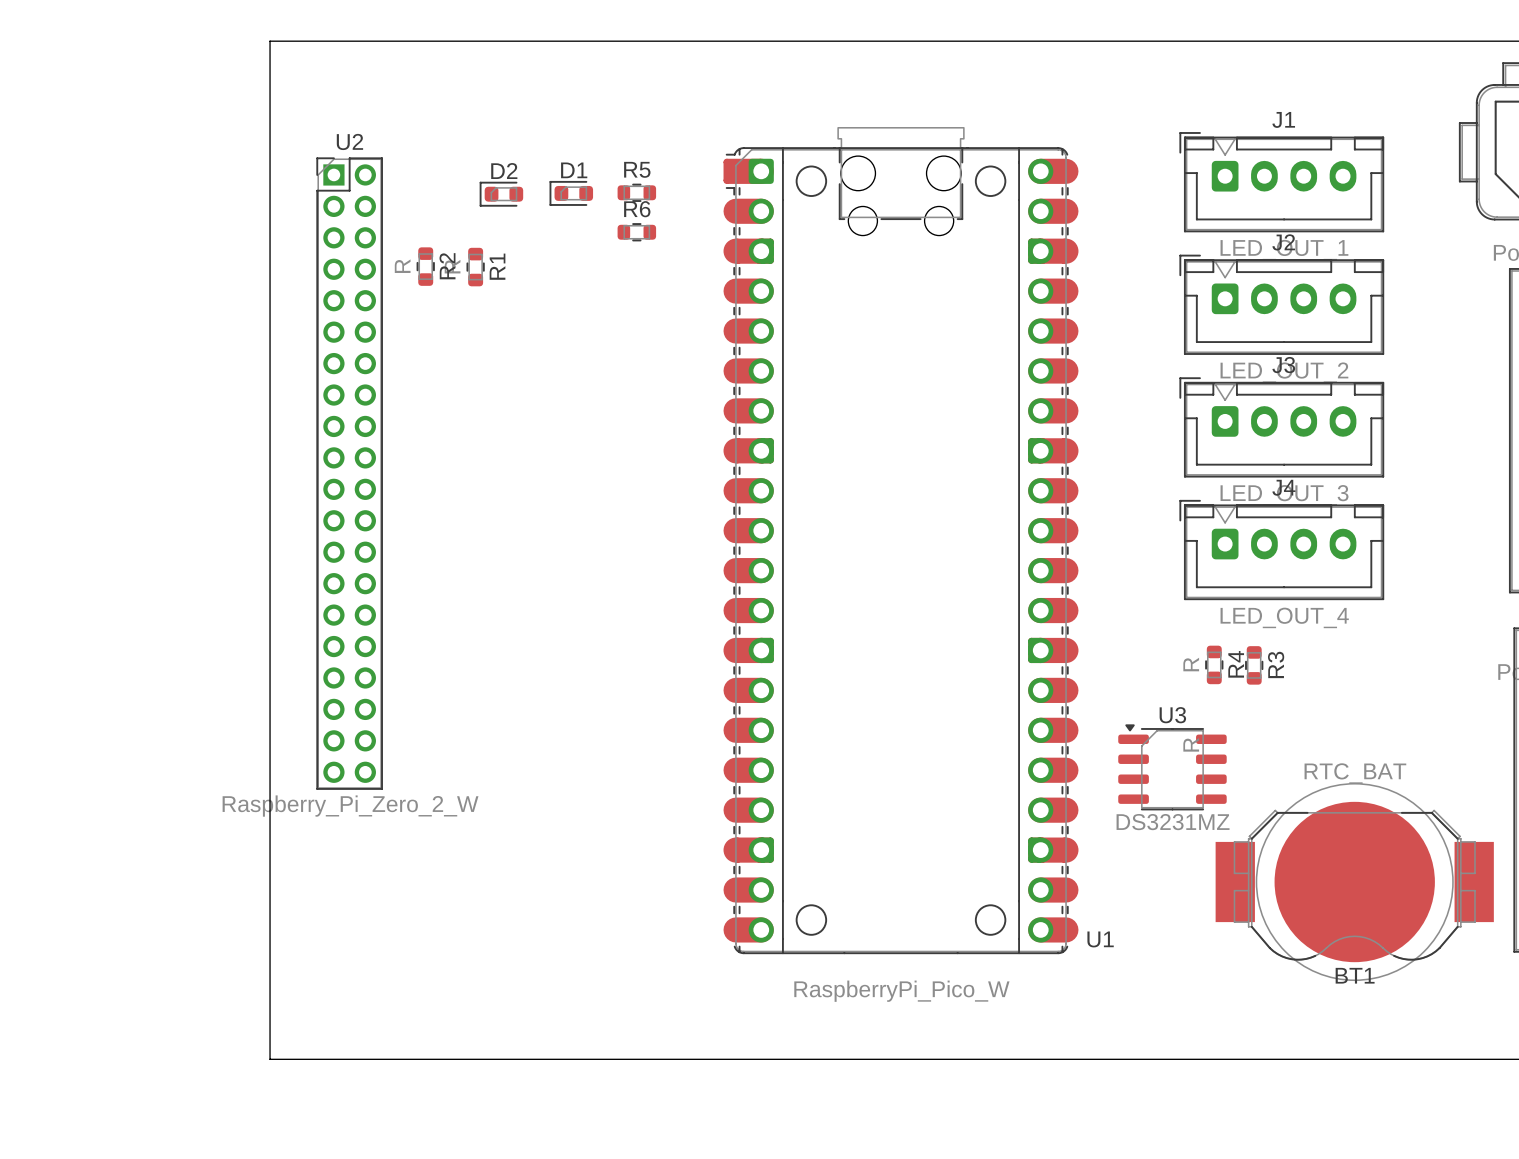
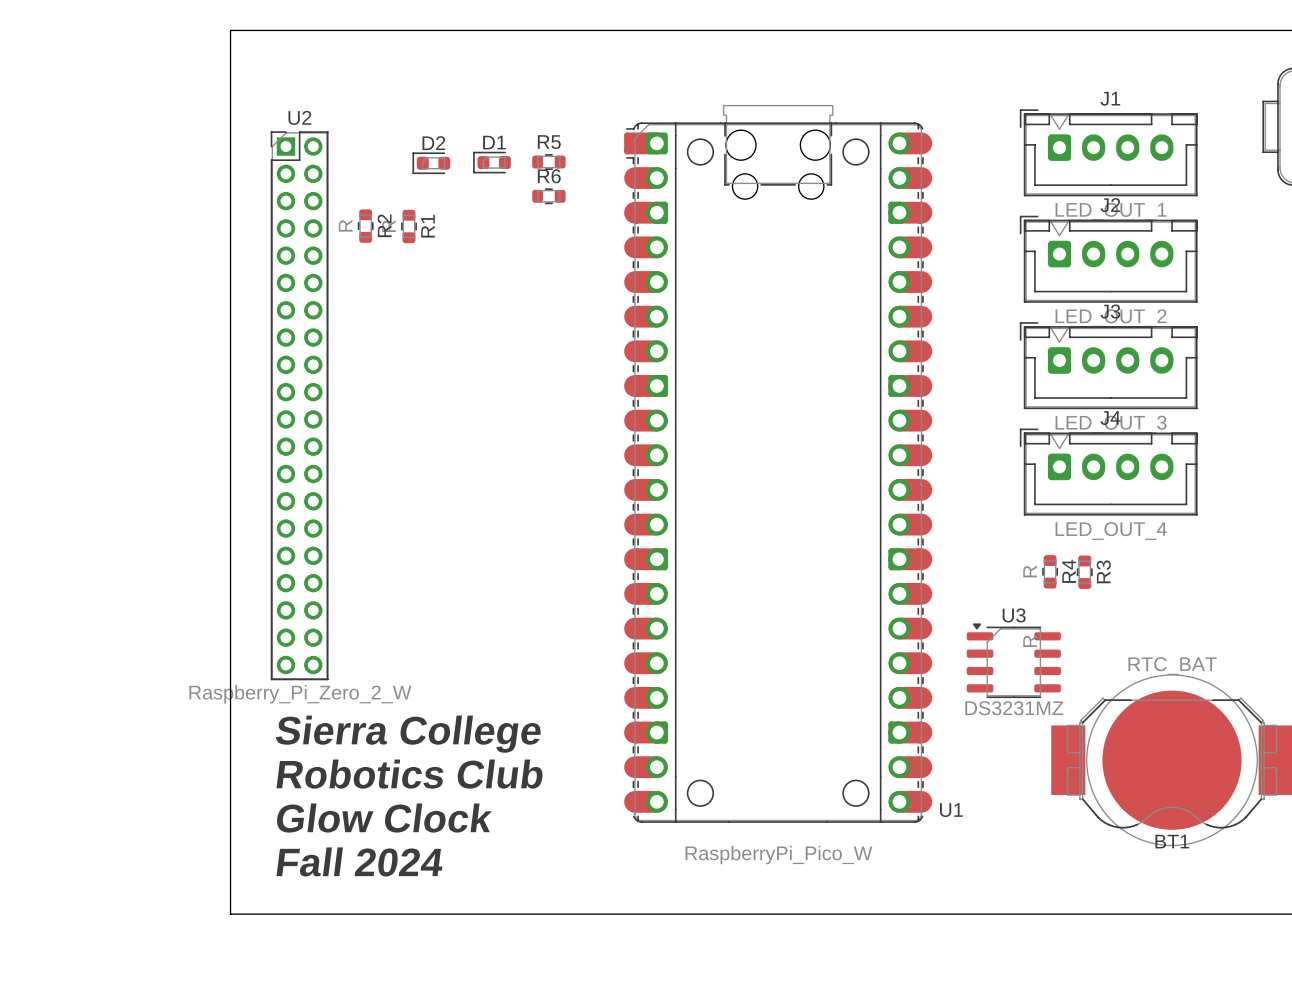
text: none -> Sierra College (408, 734)
text: none -> Robotics Club (409, 774)
text: none -> Glow Clock (384, 818)
text: none -> Fall 2024 (359, 861)

